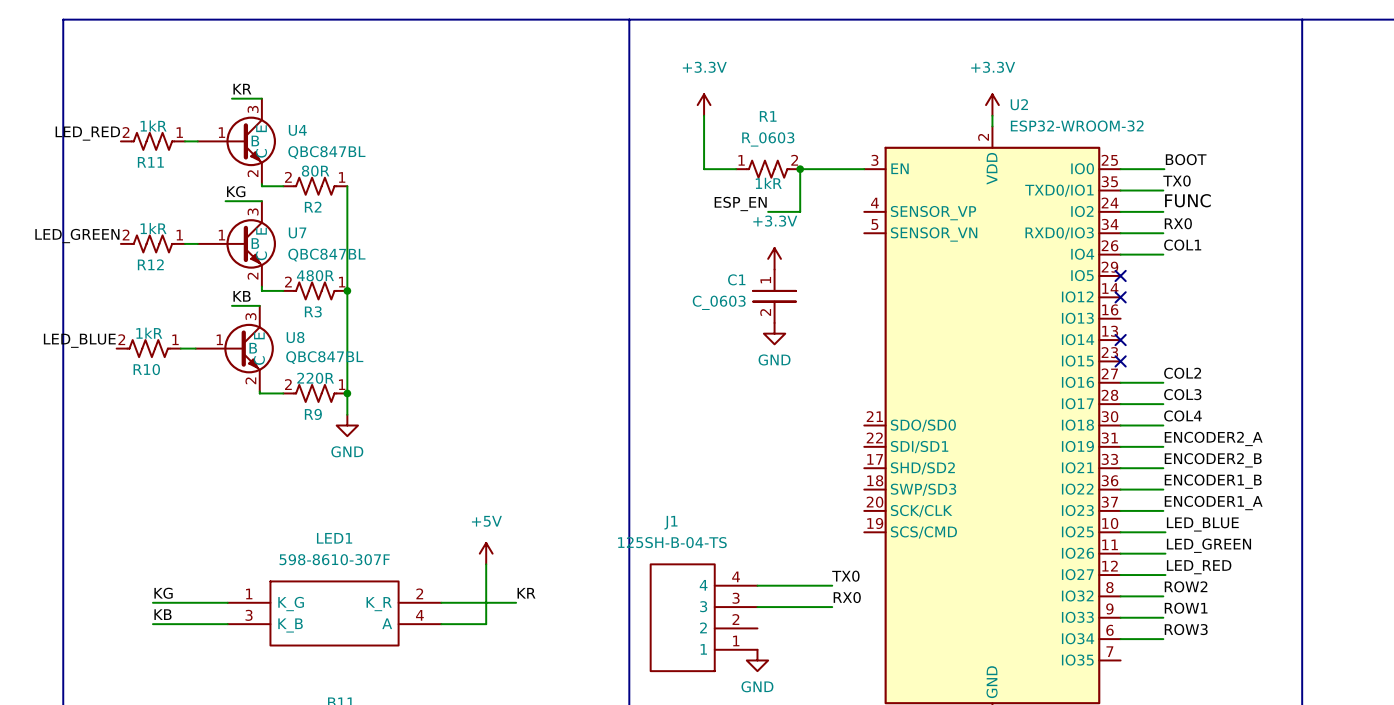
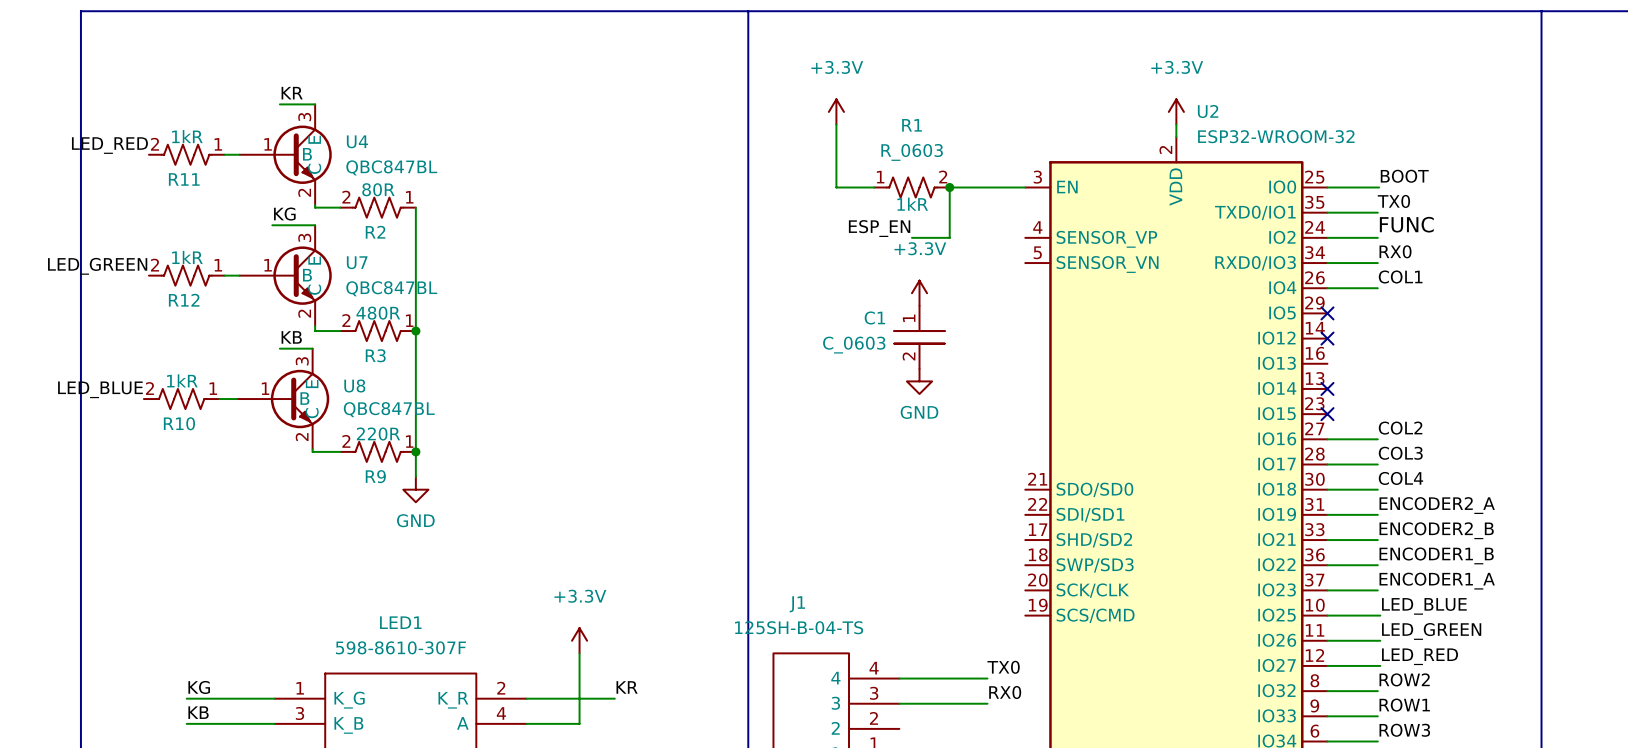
power symbol: +5V (486, 553) -> +3.3V (579, 640)

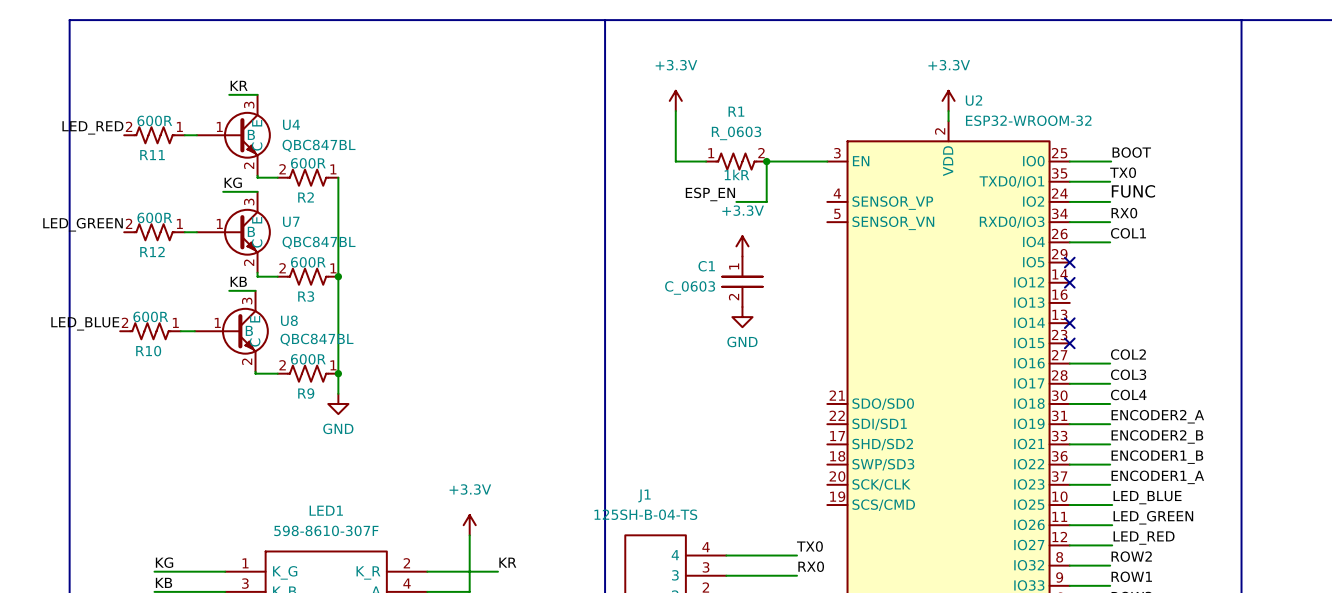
R11 text: 1kR (187, 136) -> 600R (154, 120)
R2 text: 80R (378, 189) -> 600R (308, 163)
R12 text: 1kR (187, 257) -> 600R (154, 217)
R3 text: 480R (378, 313) -> 600R (308, 262)
R10 text: 1kR (182, 380) -> 600R (150, 316)
R9 text: 220R (378, 434) -> 600R (308, 359)

